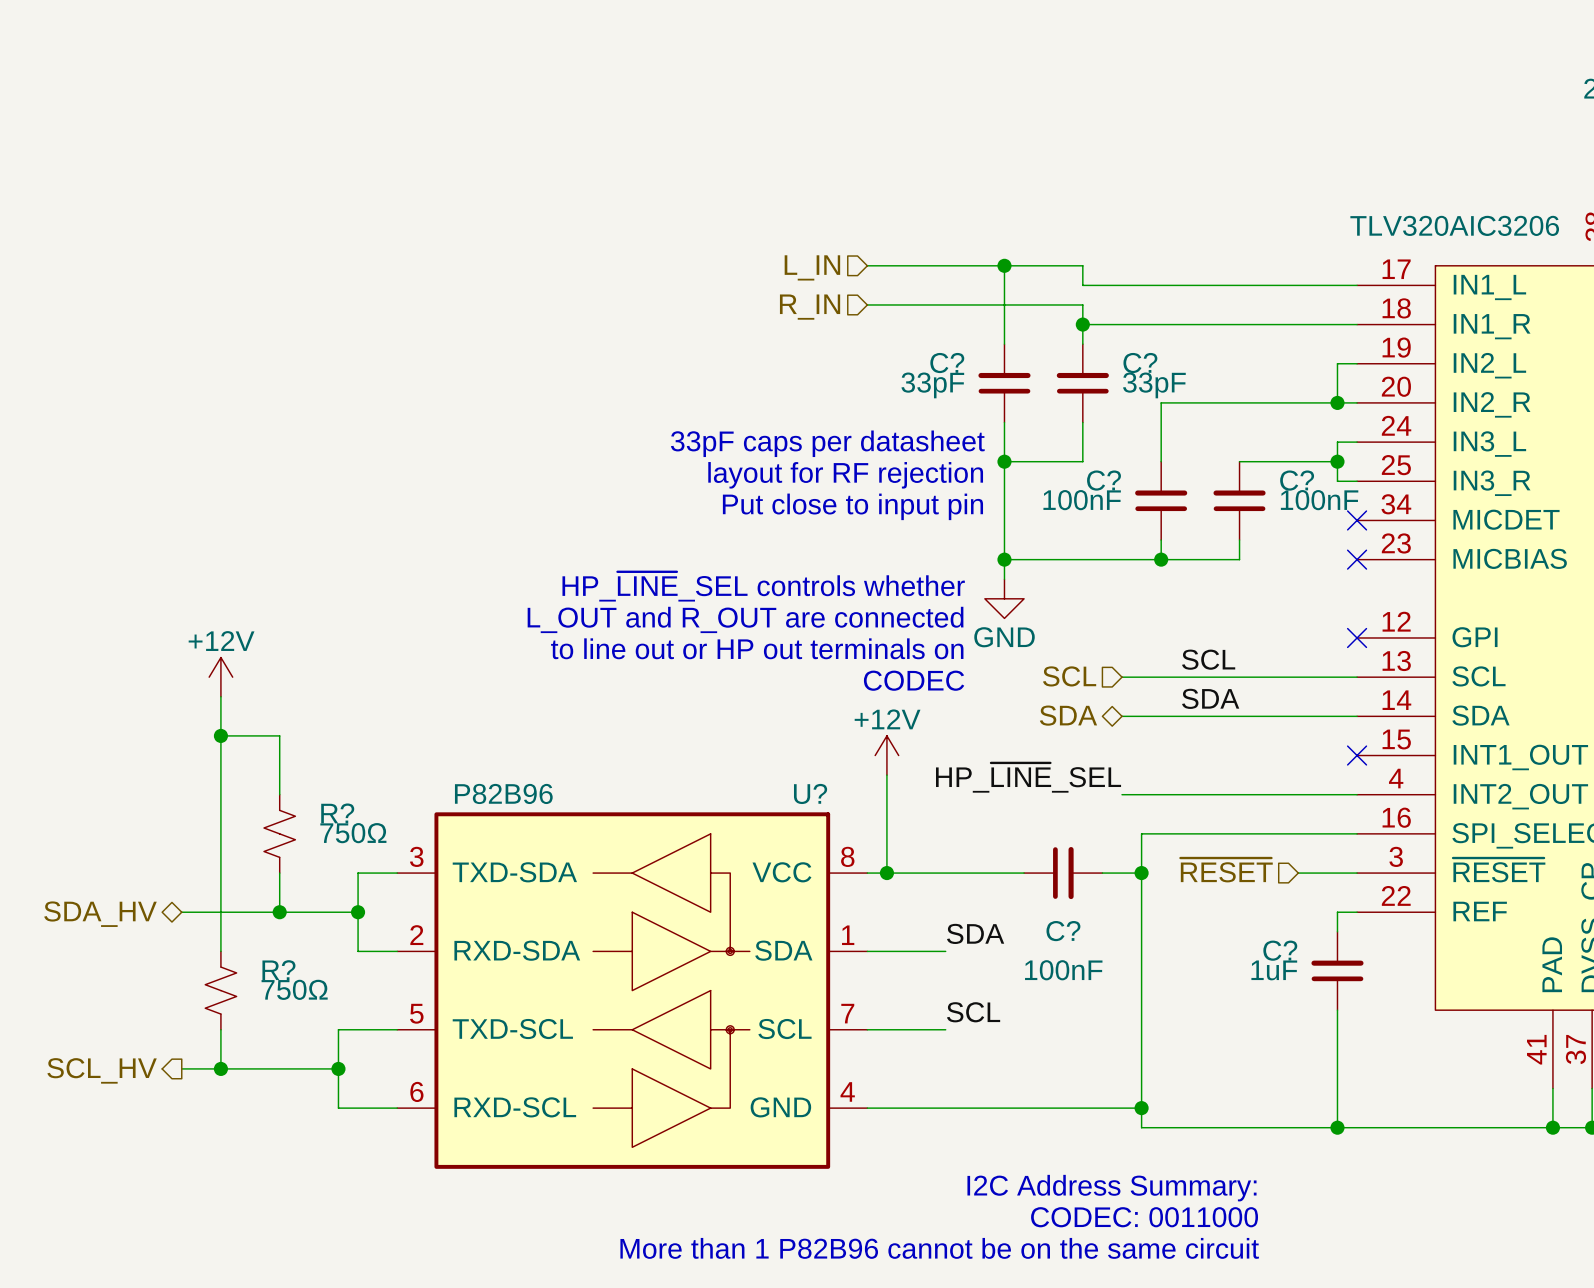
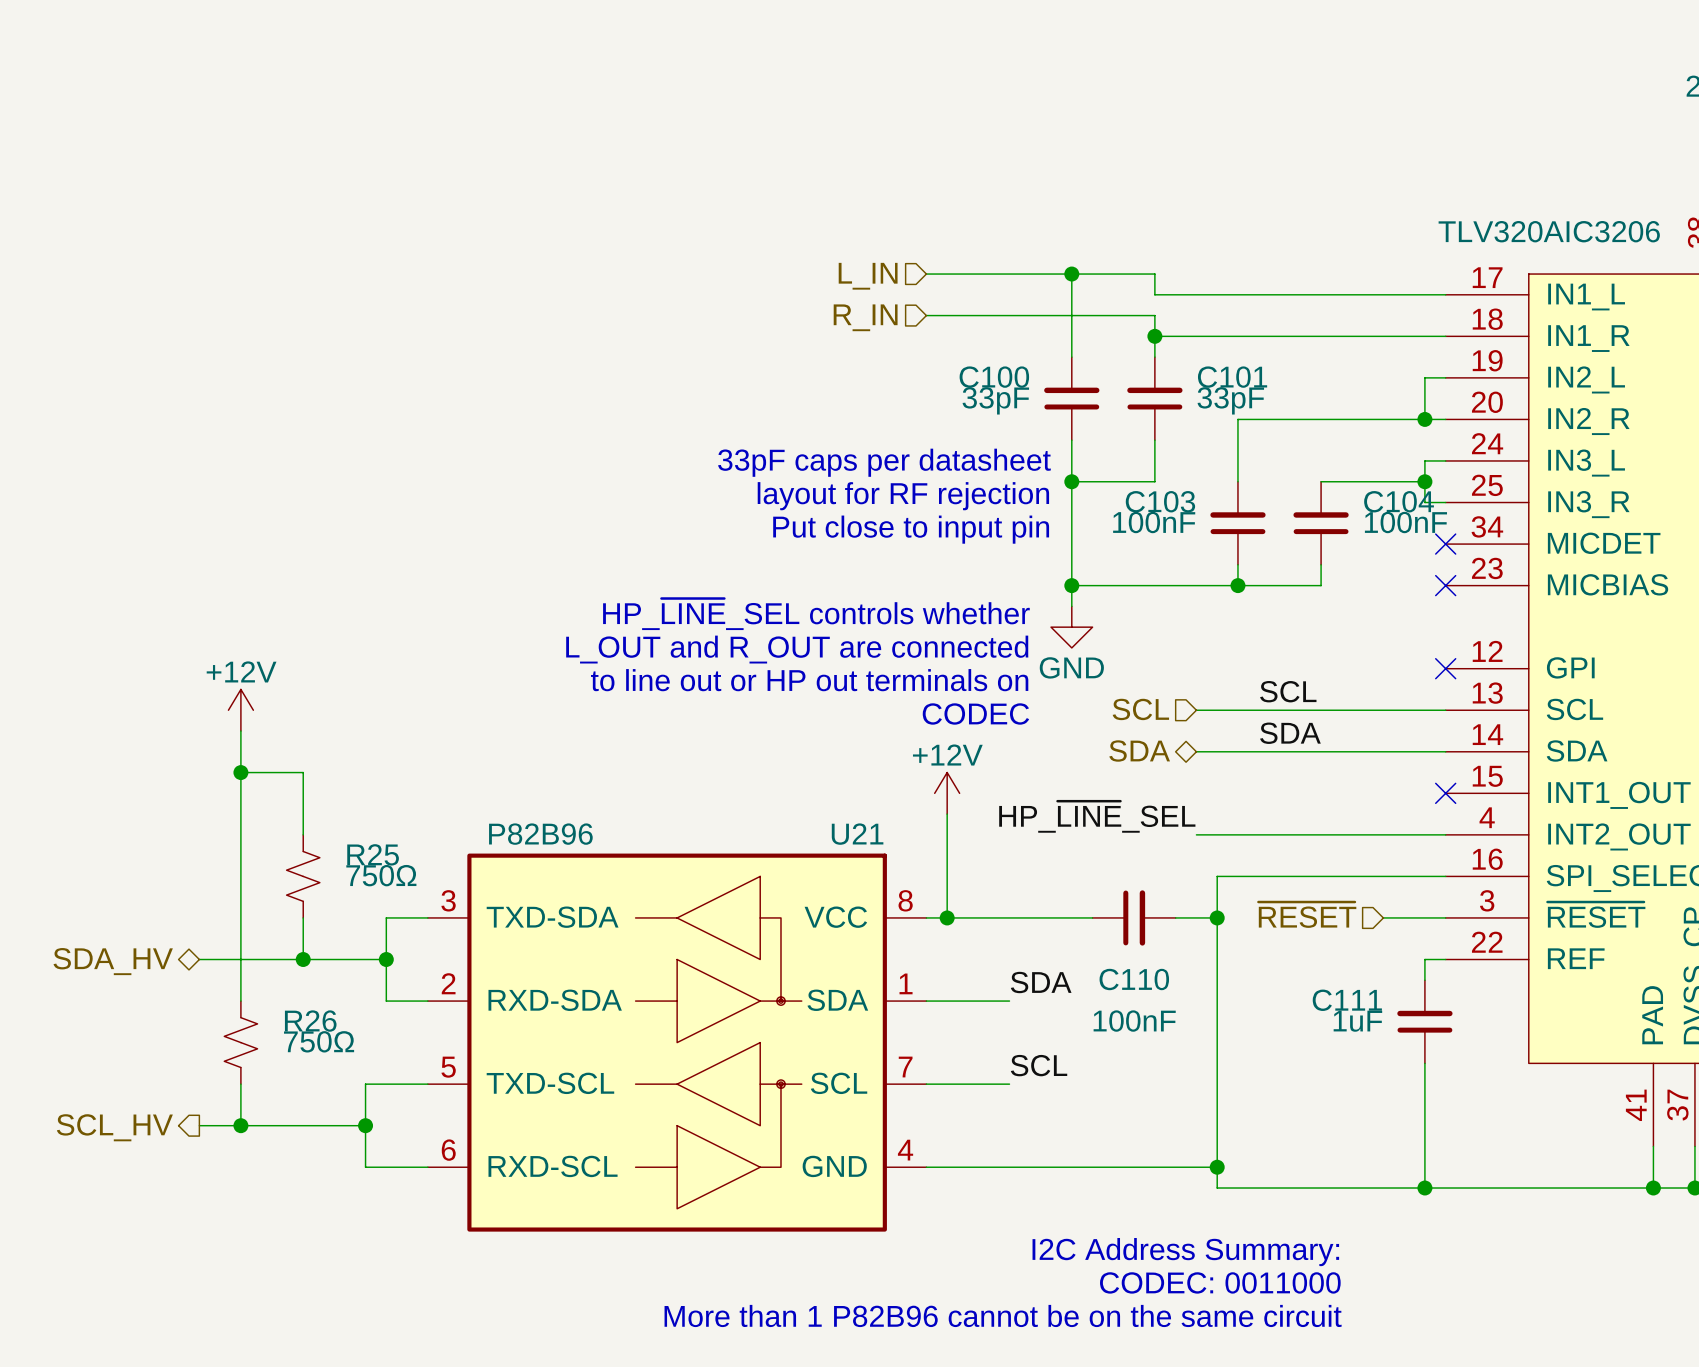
C? name: C? (947, 363) -> C100 (994, 377)
C? name: C? (1140, 363) -> C101 (1232, 377)
C? name: C? (1104, 480) -> C103 (1160, 501)
C? name: C? (1297, 480) -> C104 (1399, 501)
U? name: U? (810, 793) -> U21 (857, 834)
R? name: R? (337, 813) -> R25 (373, 854)
C? name: C? (1063, 931) -> C110 (1134, 979)
C? name: C? (1280, 950) -> C111 (1347, 1000)
R? name: R? (278, 970) -> R26 (310, 1021)

